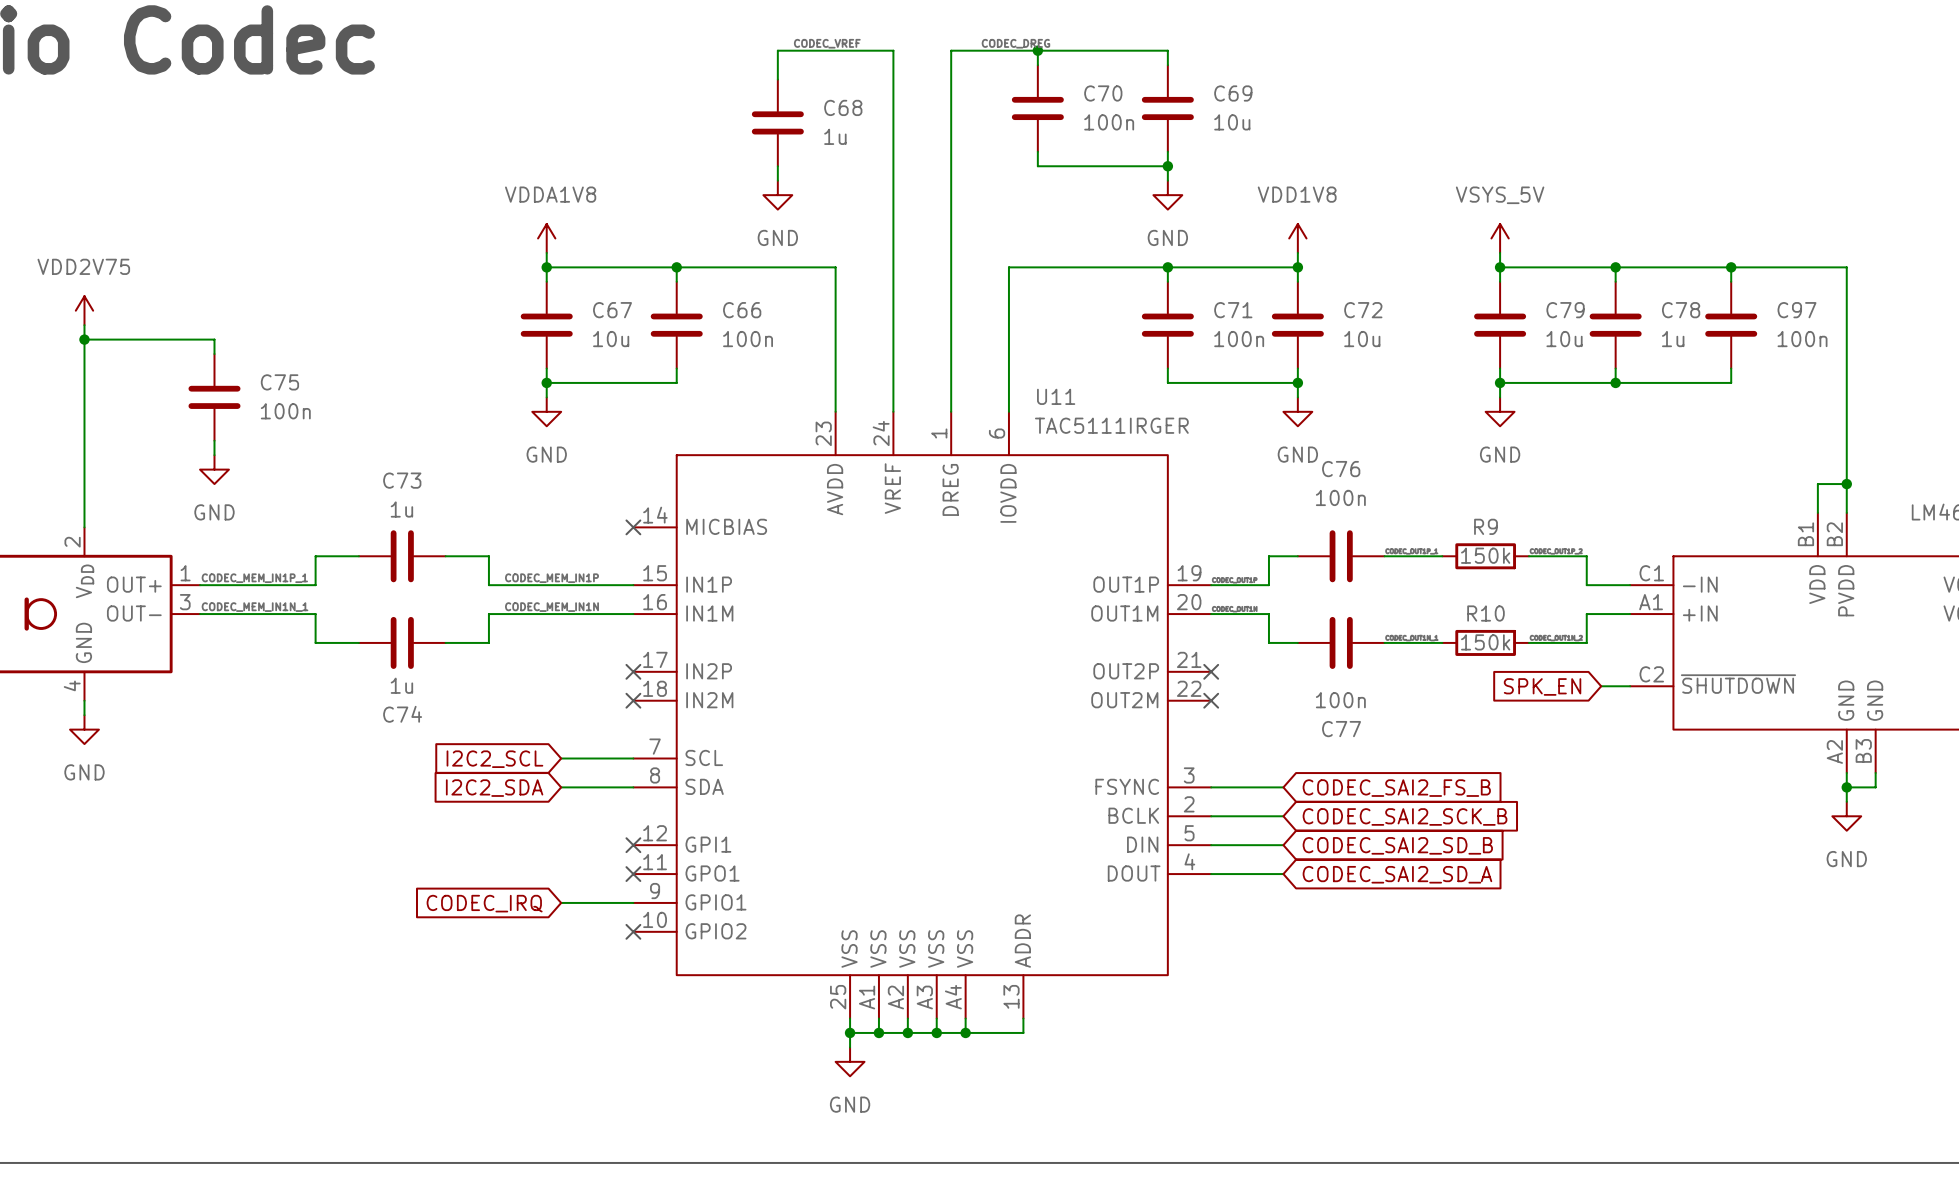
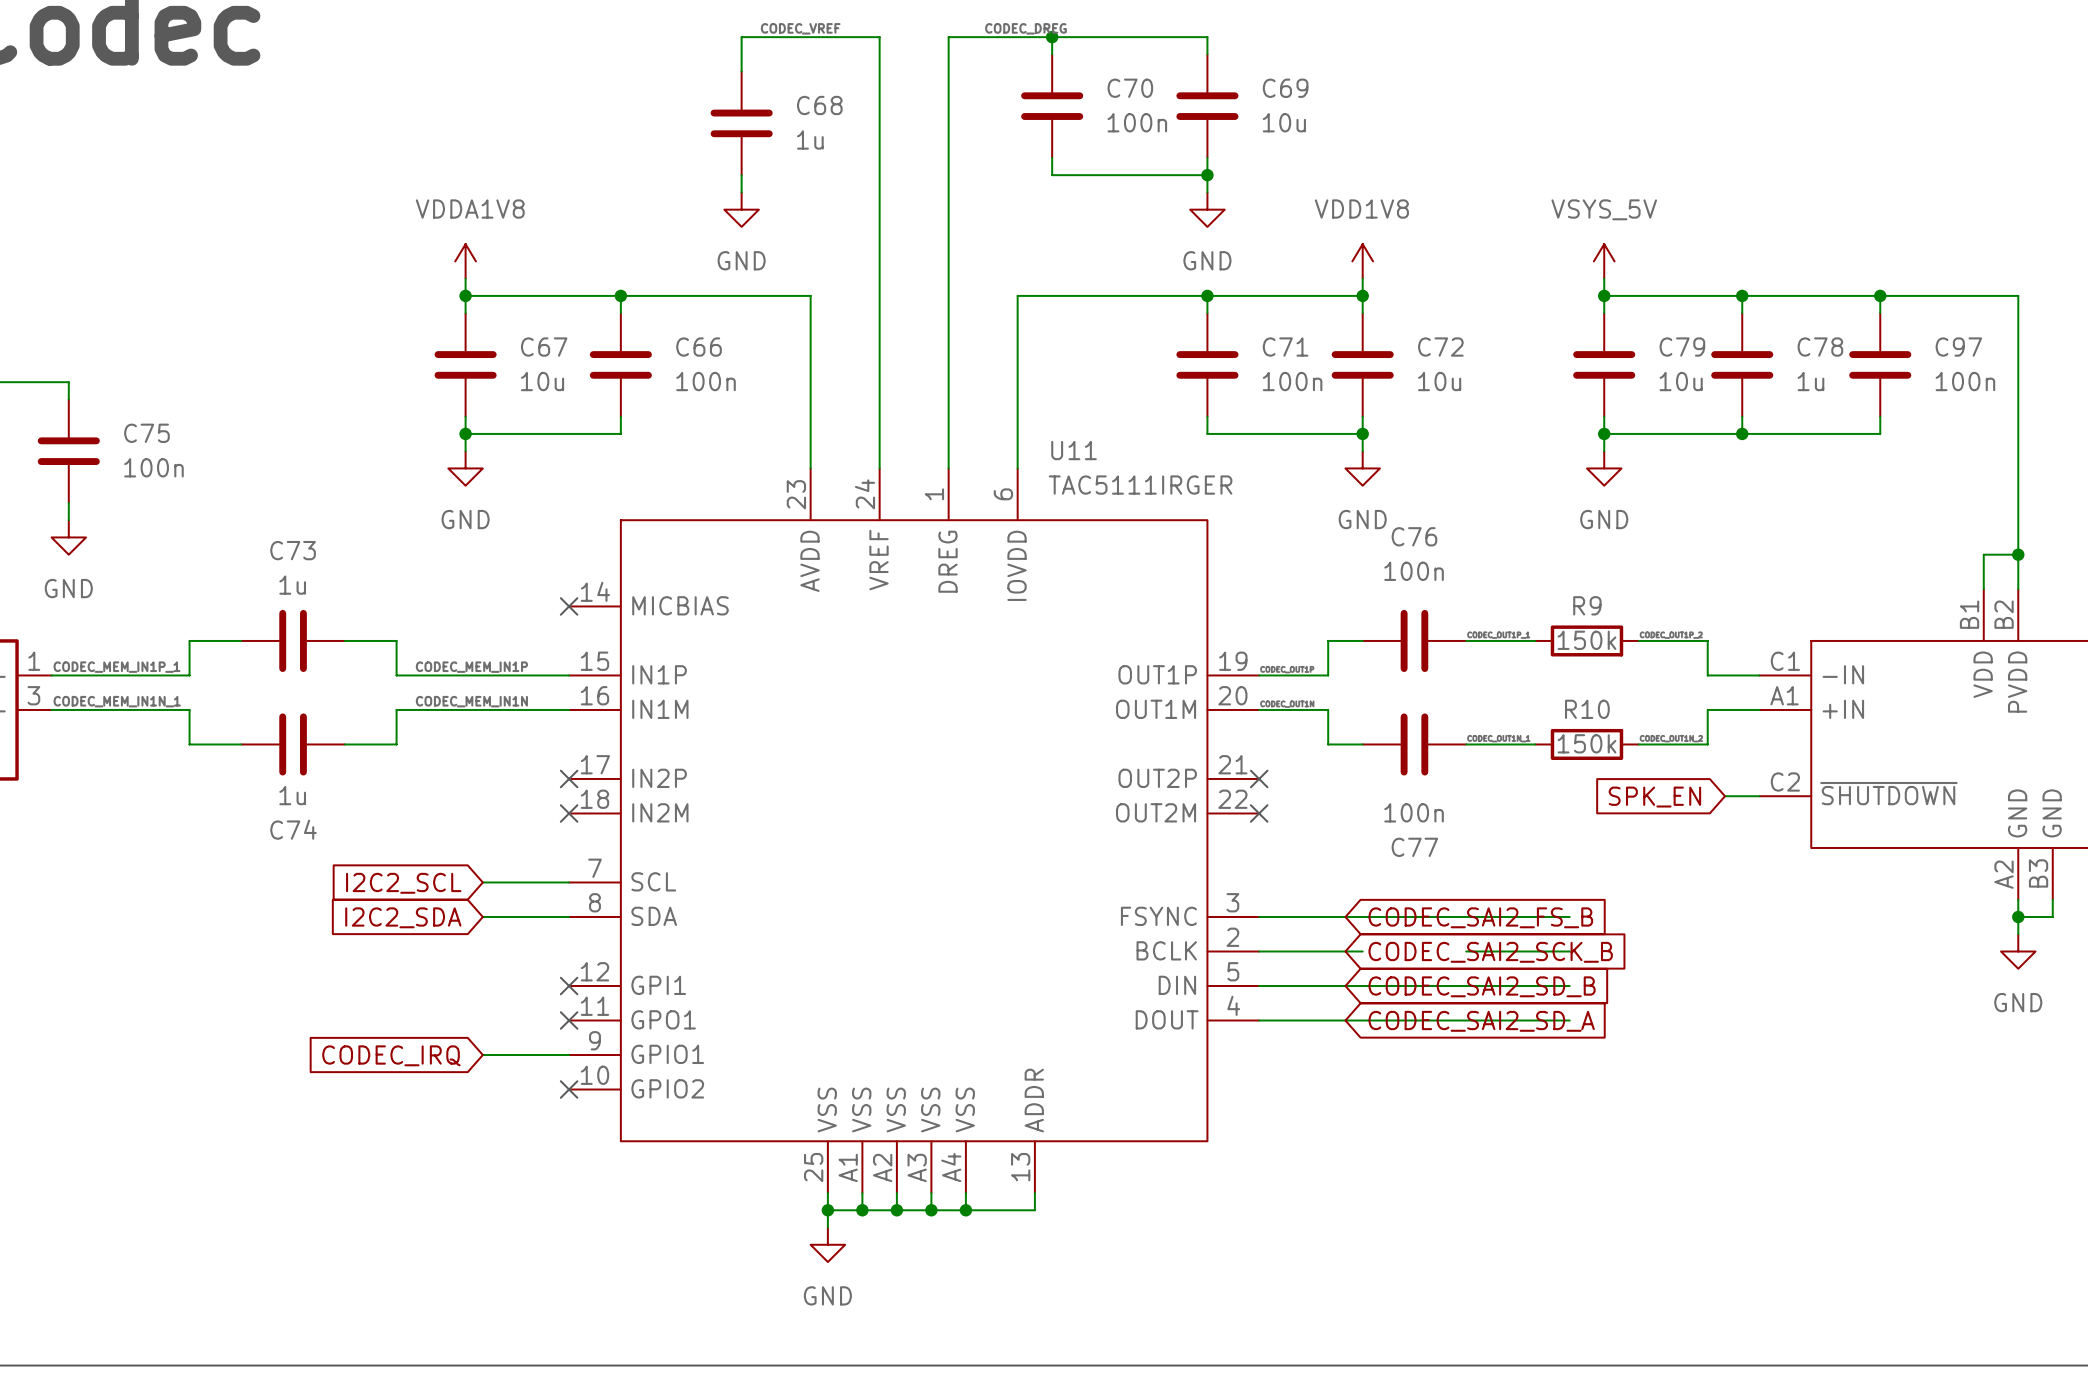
wire: none -> (1345, 916) (1569, 916)
wire: none -> (1345, 951) (1362, 951)
wire: none -> (1466, 951) (1569, 951)
wire: none -> (1345, 986) (1569, 986)
wire: none -> (1345, 1020) (1569, 1020)

